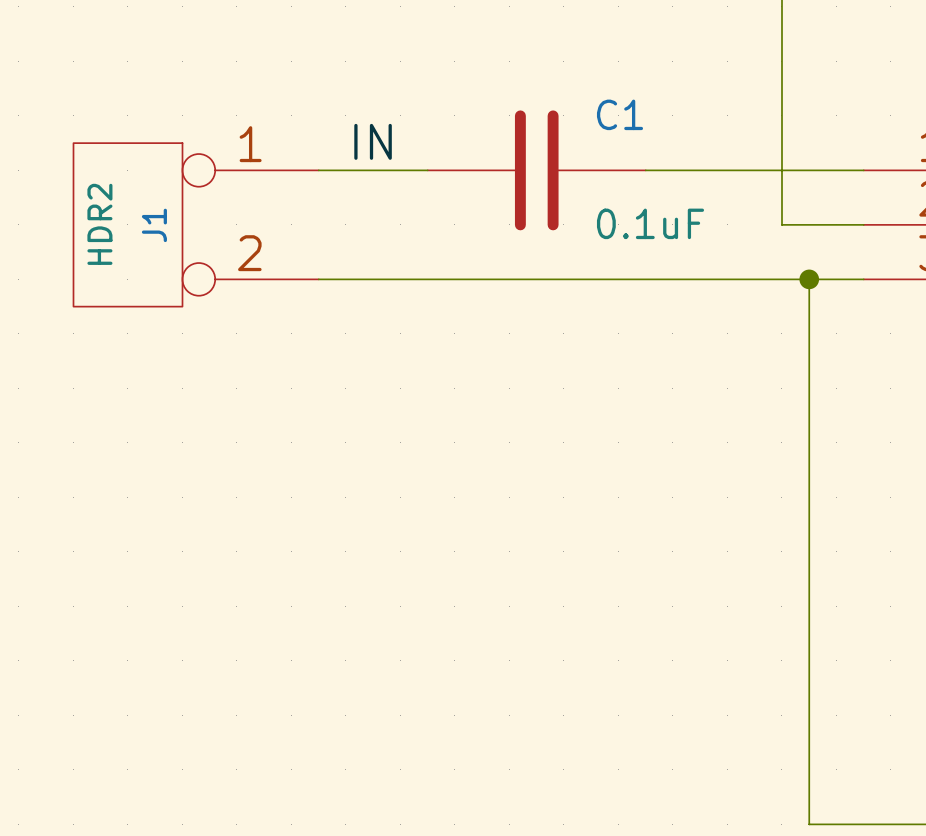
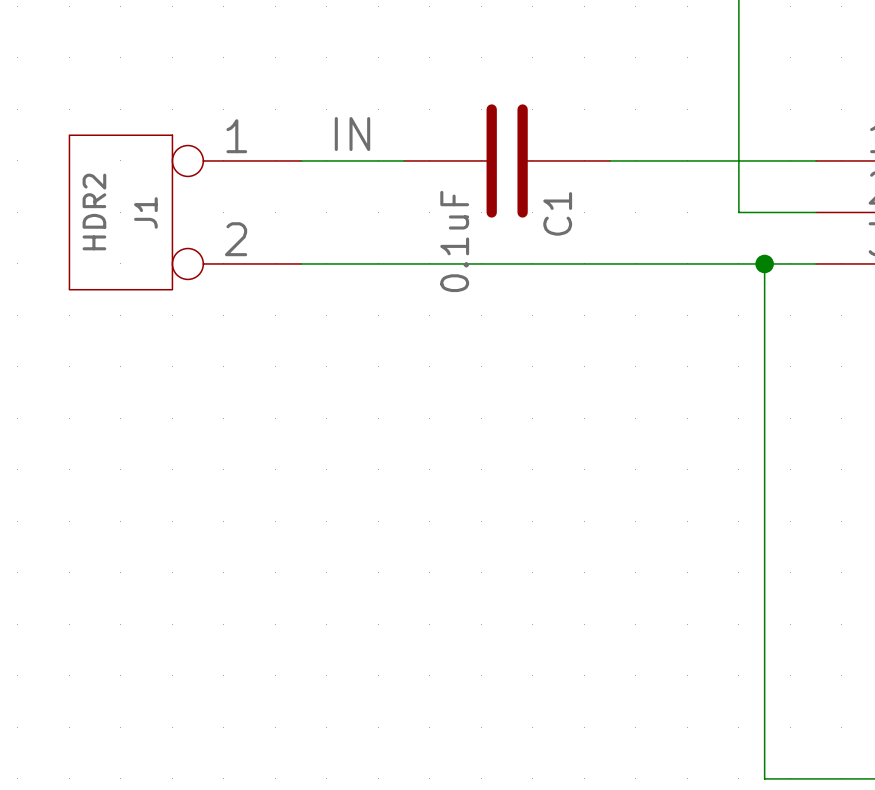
C1 name rotation: 0° (620, 114) -> 90° counterclockwise (557, 213)
C1 name position: C1 (620, 114) -> C1 (557, 213)
C1 value rotation: 0° (650, 223) -> 90° counterclockwise (454, 241)
C1 value position: 0.1uF (650, 223) -> 0.1uF (454, 241)

